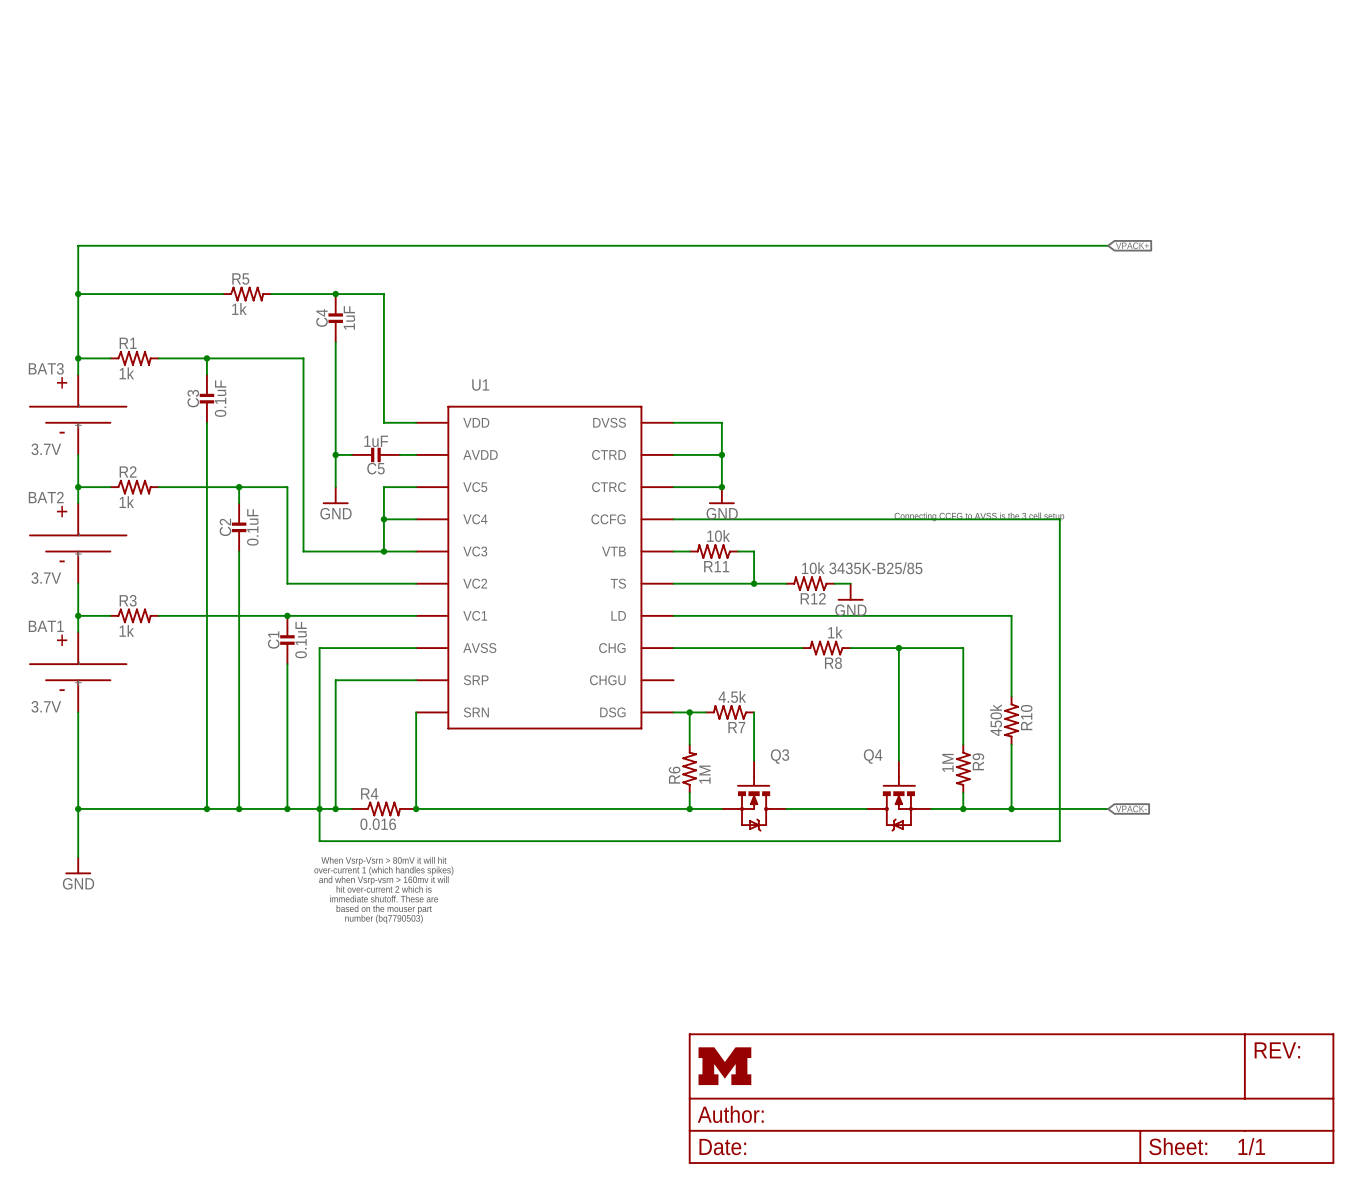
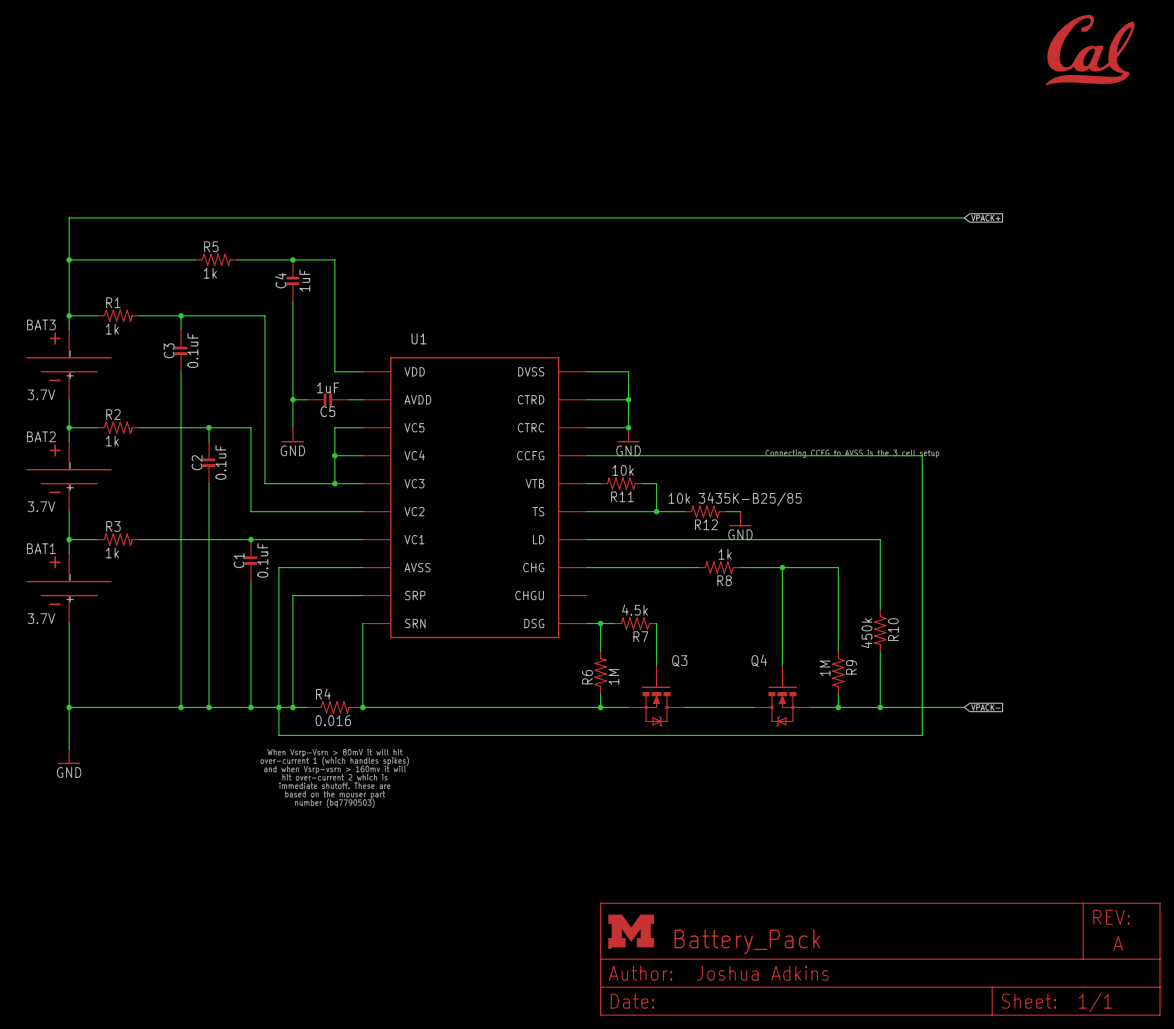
part: none -> (1090, 50)
part text: none -> Battery_Pack (747, 941)
part text: none -> A (1118, 943)
part text: none -> Joshua Adkins (762, 973)

